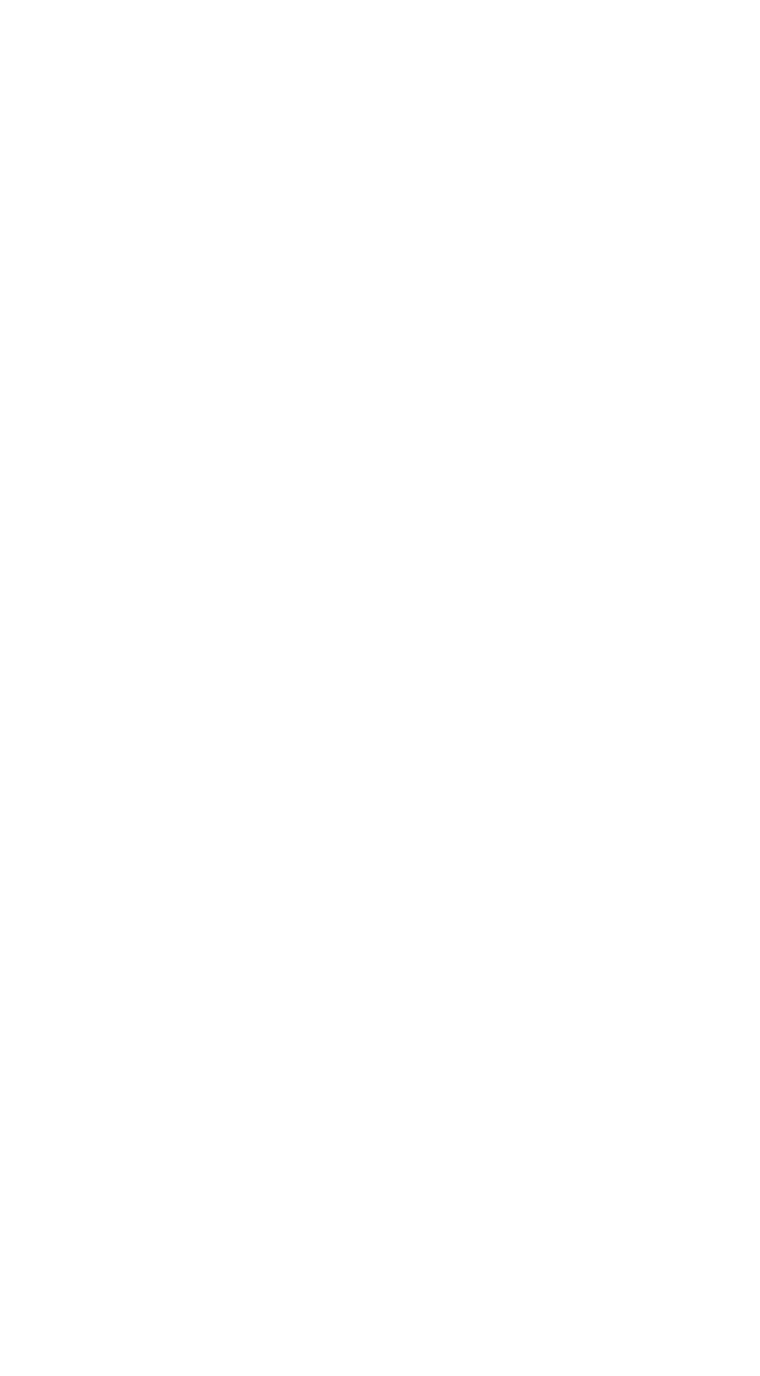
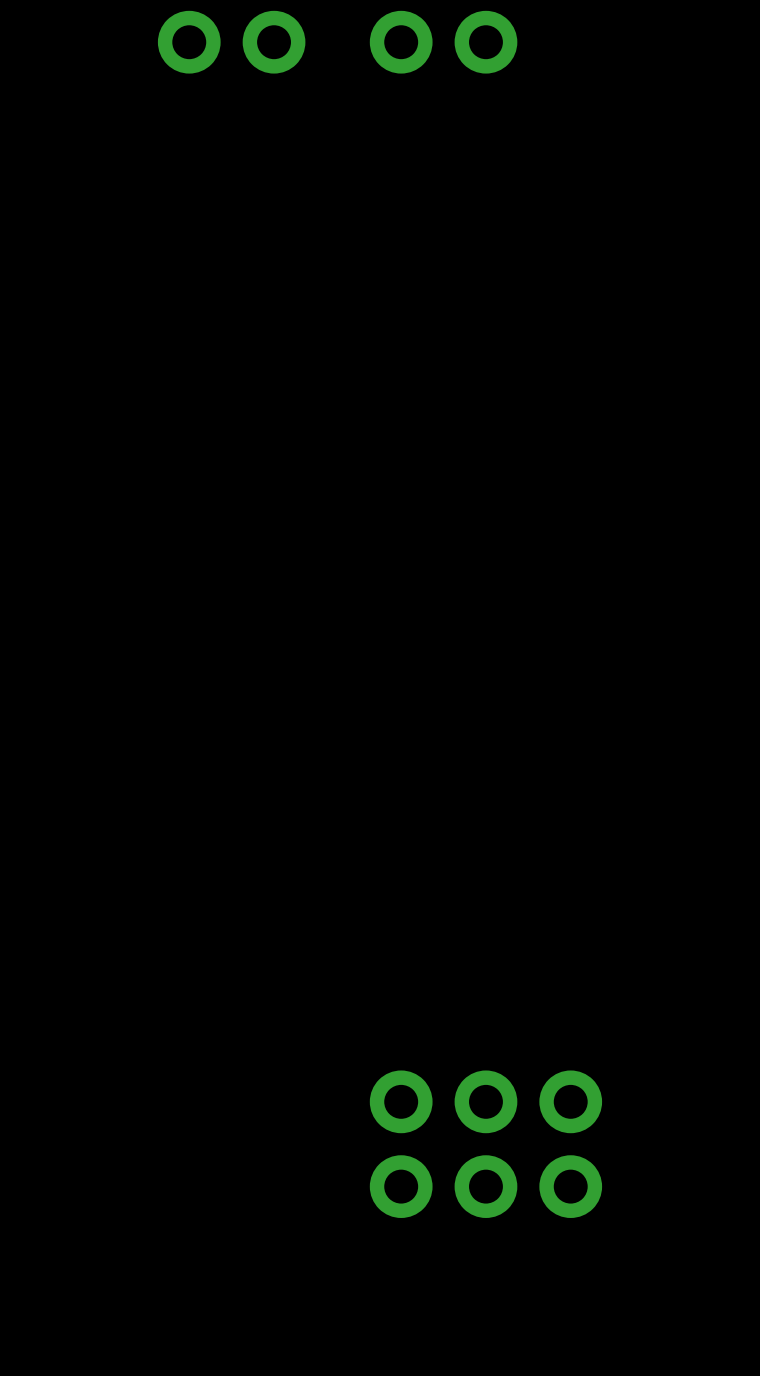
part: none -> (231, 42)
part: none -> (443, 42)
part: none -> (485, 1144)

